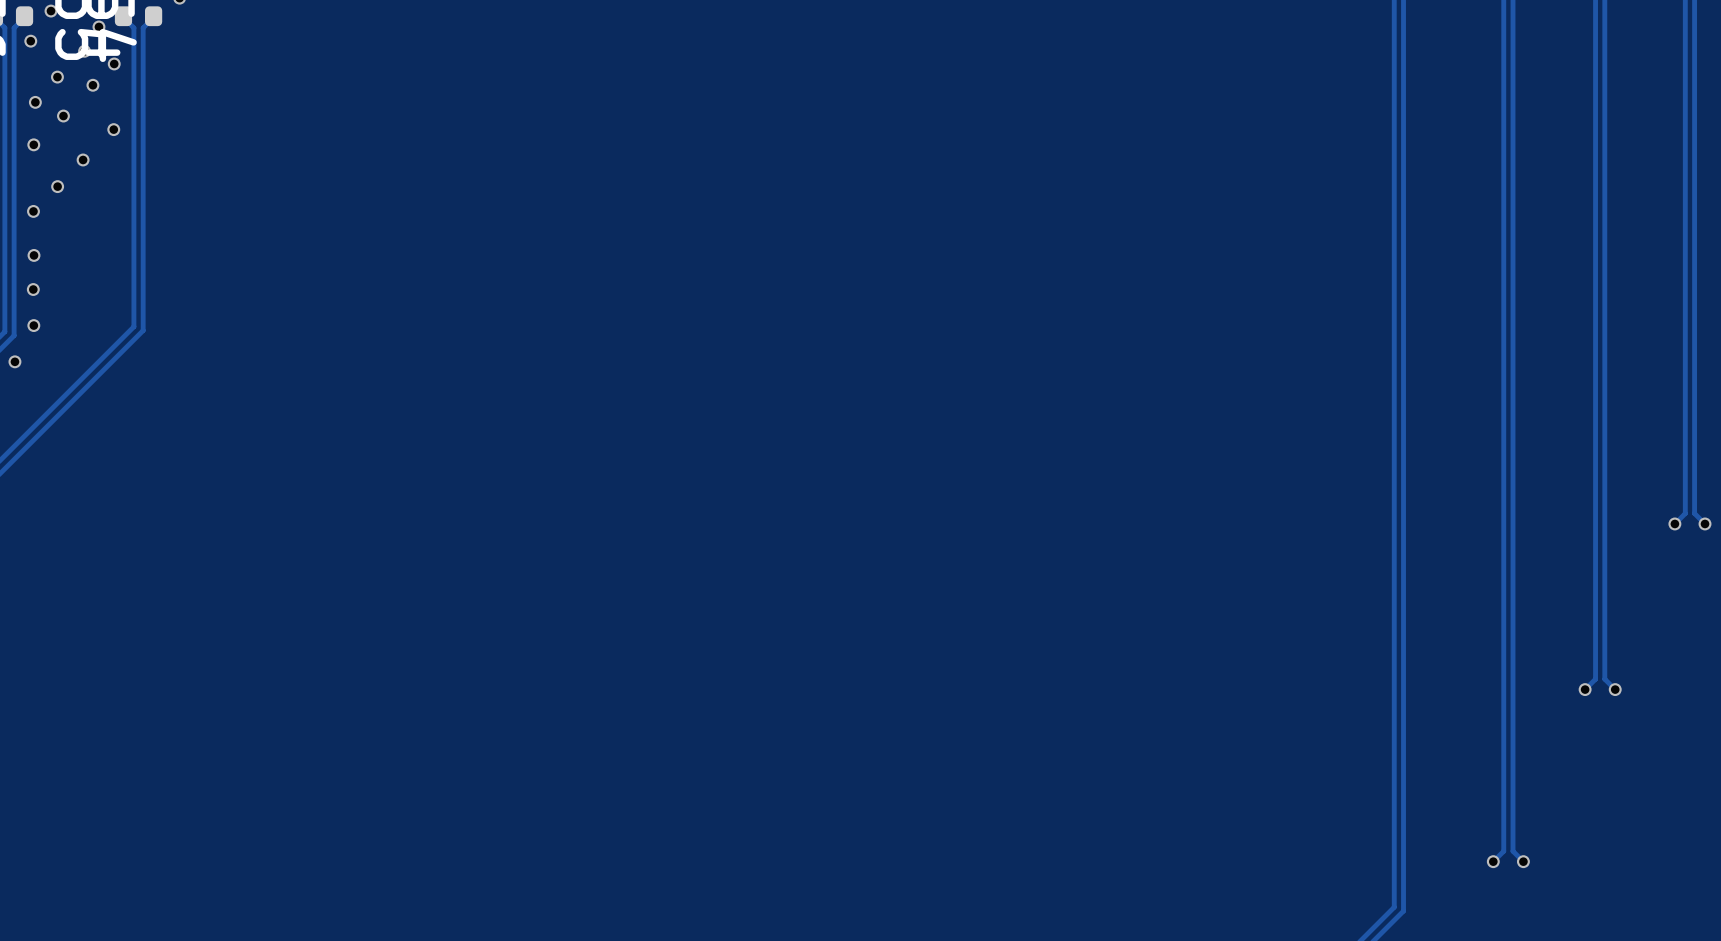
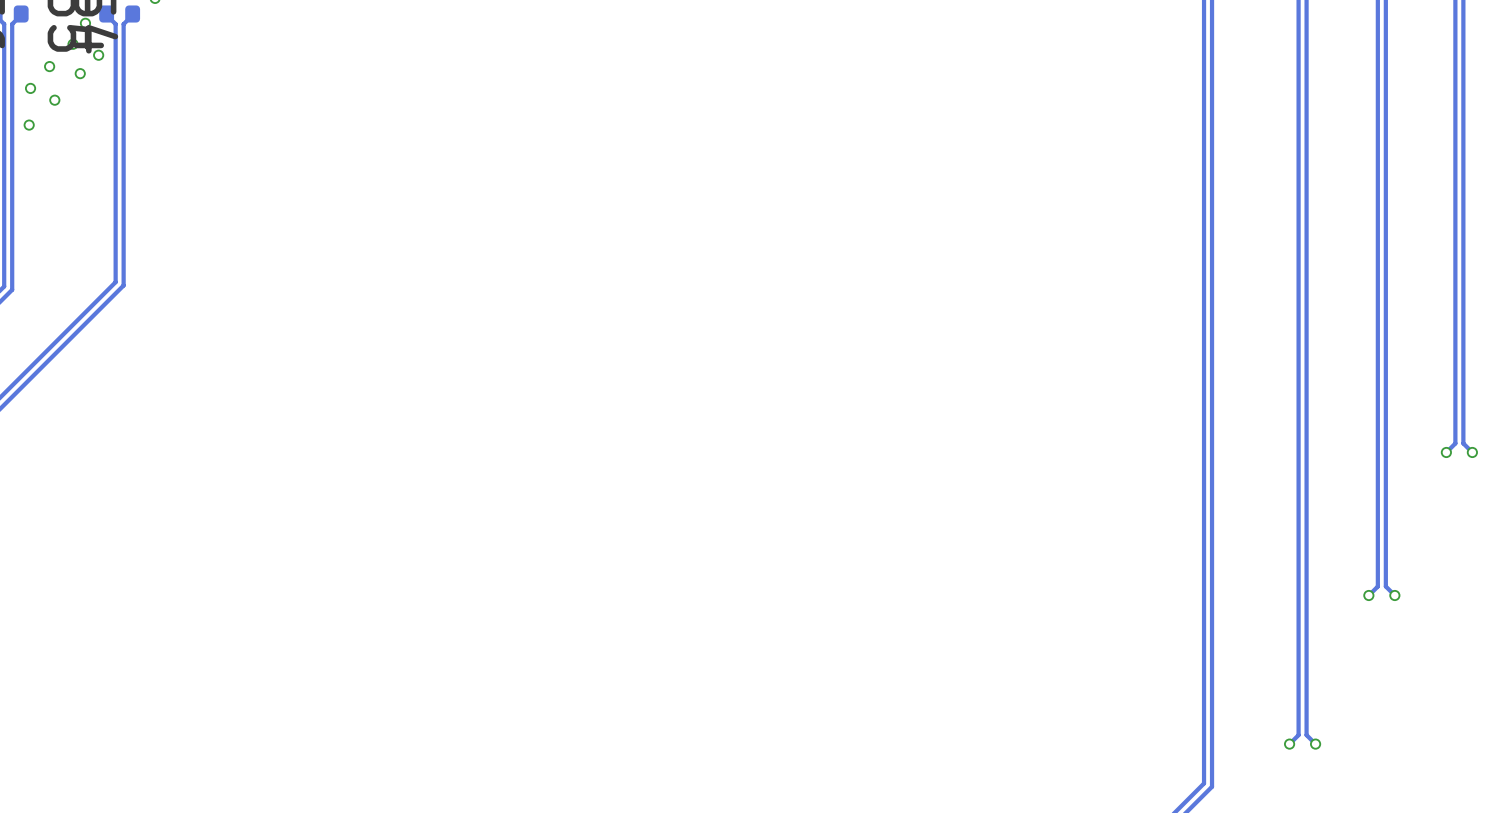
via: (51, 11) -> none
via: (30, 41) -> none
via: (113, 129) -> none
via: (83, 159) -> none
via: (57, 186) -> none
via: (33, 211) -> none
via: (34, 255) -> none
via: (33, 289) -> none
via: (33, 325) -> none
via: (14, 361) -> none

